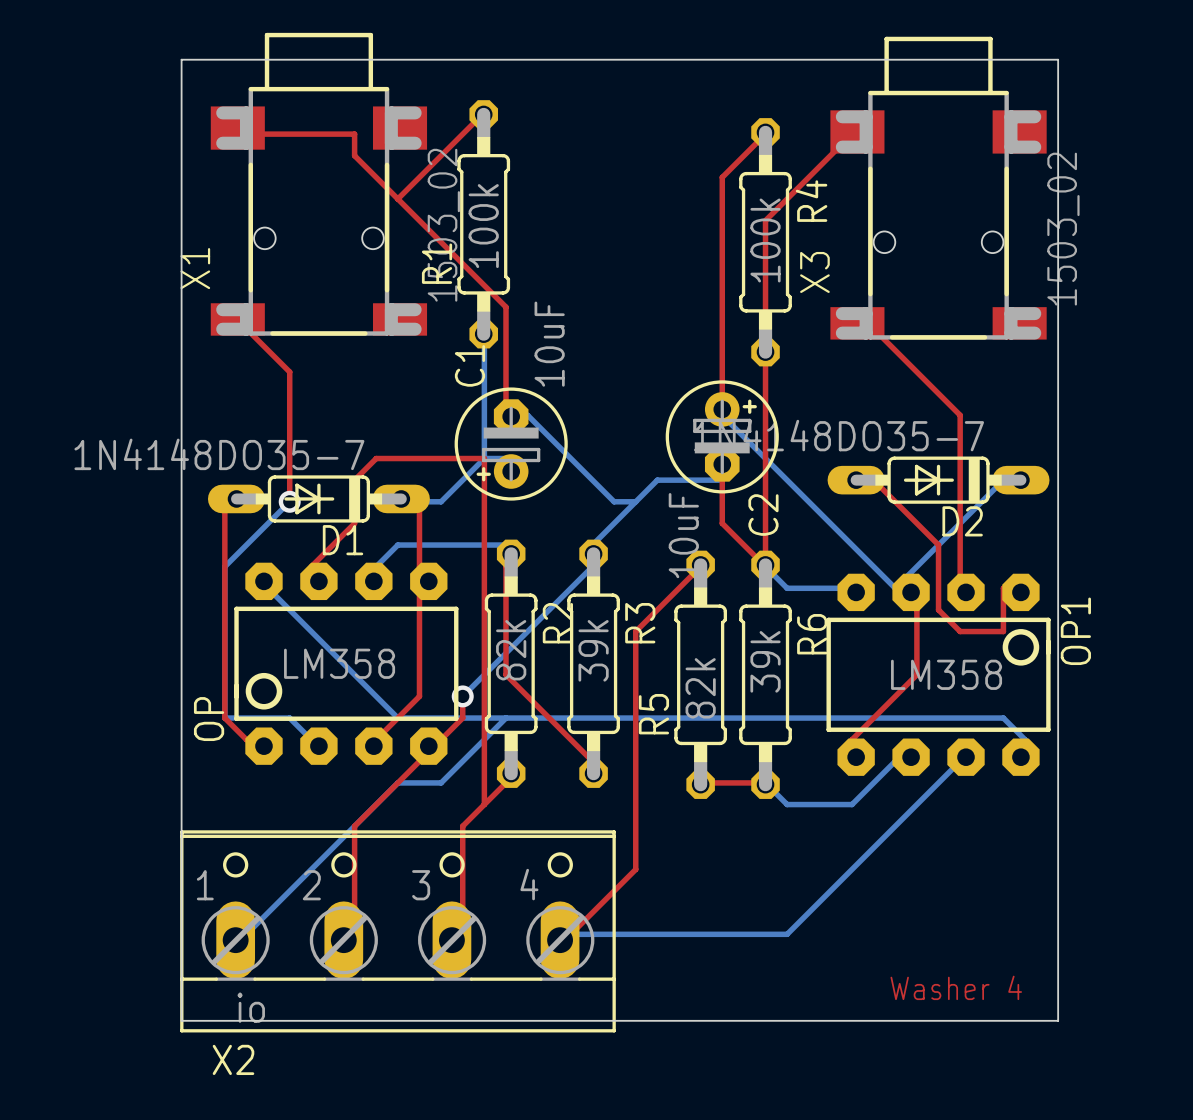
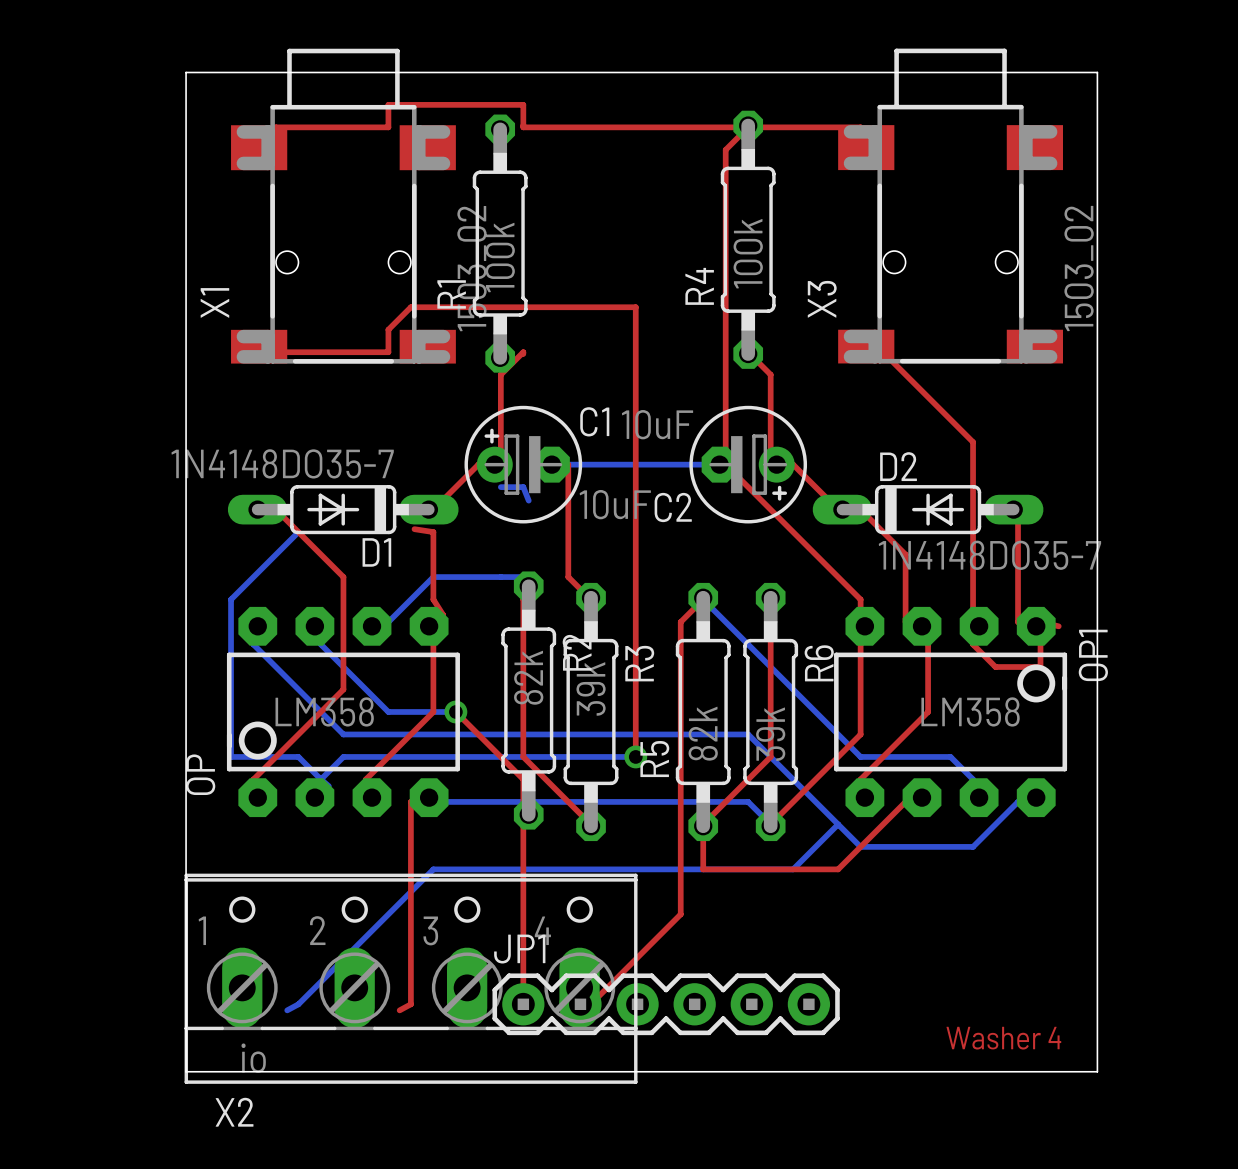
top track: none -> (748, 125) (725, 149) (725, 464)
top track: (483, 114) (484, 112) (397, 199) -> none
top track: (237, 128) (246, 134) (354, 134) (354, 155) (505, 307) (505, 328) -> (428, 509) (433, 509) (478, 464) (500, 464) (500, 374) (523, 352)
top track: none -> (866, 147) (860, 127) (523, 127) (523, 104) (388, 104) (388, 127) (276, 127) (259, 147)
top track: (857, 131) (852, 134) (765, 220) (765, 566) (722, 523) (722, 464) -> none
top track: (765, 132) (722, 177) (722, 328) -> (864, 797) (860, 779) (928, 711) (928, 644) (922, 626) (905, 622) (905, 554) (860, 509) (838, 509) (793, 464) (770, 464) (770, 374) (748, 352)
X1 position: (318, 184) -> (343, 206)
X3 position: (938, 188) -> (950, 206)
R4 name position: R4 (811, 201) -> R4 (699, 286)
R4 value position: 100k (765, 240) -> 100k (748, 253)
R4 position: (765, 242) -> (748, 239)
top track: (237, 319) (289, 372) (289, 501) -> none
top track: none -> (259, 346) (276, 352) (388, 352) (388, 329) (410, 307) (635, 307) (635, 756)
top track: (857, 323) (873, 328) (960, 415) (960, 588) (966, 592) -> none
top track: (505, 330) (505, 415) (511, 416) -> none
top track: (722, 330) (722, 409) -> none
bottom track: (483, 334) (484, 328) (484, 458) (441, 501) (419, 501) (401, 498) -> none
bottom track: (722, 409) (722, 415) (895, 588) -> none
bottom track: (511, 416) (527, 415) (614, 501) (635, 501) -> none
top track: none -> (551, 464) (568, 464) (568, 577) (590, 599) (591, 597)
bottom track: none -> (551, 464) (719, 464)
top track: none -> (725, 464) (860, 599) (860, 622) (864, 626) (860, 644) (860, 734) (770, 826)
C2 rotation: 0° (722, 436) -> 90° clockwise (748, 464)
C1 rotation: 0° (511, 444) -> 90° clockwise (523, 464)
bottom track: (722, 464) (722, 480) (657, 480) (592, 545) (592, 566) (462, 696) -> none
top track: none -> (257, 509) (276, 509) (343, 577) (343, 689) (253, 779) (257, 797)
top track: (856, 480) (873, 480) (938, 545) -> (866, 346) (883, 352) (973, 442) (973, 577)
D2 rotation: 0° (938, 480) -> 180° (928, 509)
top track: none -> (1013, 509) (1018, 509) (1018, 622) (1036, 626)
bottom track: (1020, 480) (1003, 480) (895, 588) -> none
top track: (236, 498) (224, 501) (224, 718) (246, 739) (263, 746) -> none
D1 position: (318, 498) -> (343, 509)
via: (289, 501) -> none
bottom track: (419, 545) (397, 545) (376, 566) (373, 581) -> (433, 577) (388, 622) (372, 626)
top track: none -> (703, 597) (680, 622) (680, 914) (590, 1004) (580, 1004)
top track: (700, 564) (635, 631) (635, 869) (570, 934) (560, 940) -> none
top track: none -> (770, 597) (770, 756) (703, 824) (703, 869) (838, 869) (905, 801) (922, 797)
bottom track: (765, 564) (787, 588) (852, 588) (856, 592) -> none
bottom track: (263, 581) (268, 588) (397, 718) -> (314, 797) (320, 779) (343, 756) (410, 756)
top track: (318, 581) (311, 566) (354, 523) (354, 480) (376, 458) (484, 458) (484, 804) -> none
bottom track: none -> (314, 626) (320, 644) (388, 711) (455, 711)
top track: (911, 592) (916, 609) (916, 674) (852, 739) (856, 757) -> none
R6 value position: 39k (765, 661) -> 39k (770, 734)
OP position: (346, 663) -> (343, 711)
R3 position: (593, 663) -> (591, 711)
top track: (419, 674) (419, 696) (376, 739) (373, 746) -> (433, 711) (365, 779) (372, 797)
top track: none -> (455, 711) (523, 779) (523, 1004)
top track: (505, 674) (592, 761) (593, 773) -> (523, 711) (523, 756) (591, 826)
R5 position: (700, 674) -> (703, 711)
R6 position: (765, 674) -> (770, 711)
OP1 position: (938, 674) -> (950, 711)
top track: (462, 696) (462, 718) (441, 739) (428, 746) (419, 761) (354, 826) (354, 934) (343, 940) -> none
via position: (462, 696) -> (455, 711)
bottom track: (505, 718) (441, 782) (397, 782) (246, 934) (235, 940) -> none
bottom track: (614, 718) (830, 718) -> (703, 597) (860, 756)
via: none -> (635, 756)
bottom track: (916, 718) (1003, 718) (1025, 739) (1020, 757) -> (950, 756) (973, 779) (979, 797)
top track: none -> (429, 797) (410, 801) (410, 1004) (399, 1010)
bottom track: none -> (429, 797) (433, 801) (748, 801) (770, 826)
bottom track: (911, 757) (895, 761) (852, 804) -> (1036, 797) (1018, 801) (973, 846) (883, 846)
bottom track: (966, 757) (787, 934) (570, 934) (560, 940) -> none
top track: (511, 773) (505, 782) (462, 826) (462, 934) (451, 940) -> none
bottom track: none -> (838, 824) (793, 869) (433, 869) (298, 1004) (287, 1010)
top track: (700, 784) (700, 782) (765, 782) (765, 784) -> none
bottom track: (765, 784) (765, 782) (787, 804) (830, 804) -> (257, 626) (253, 644) (343, 734) (748, 734) (860, 846)
JP1: none -> (666, 1004)

